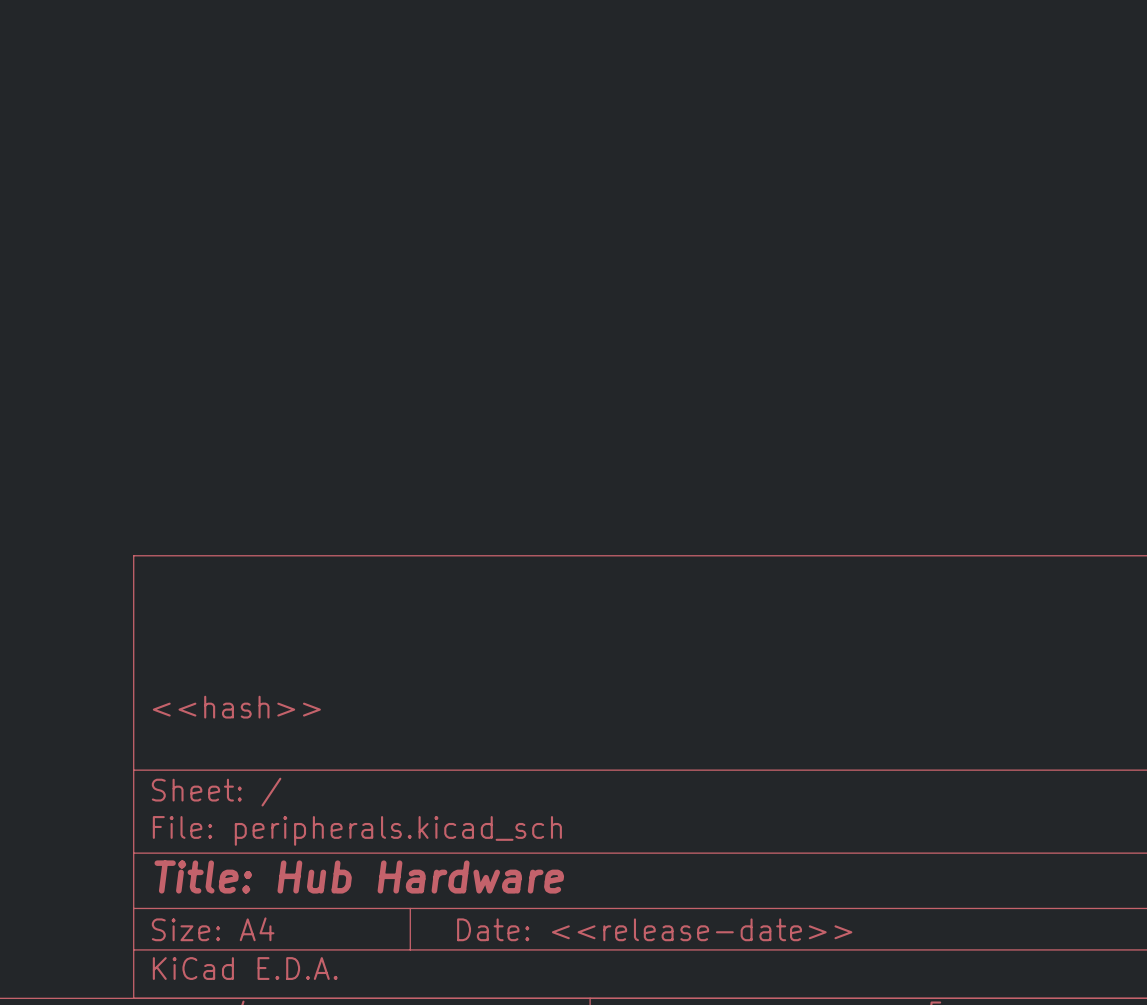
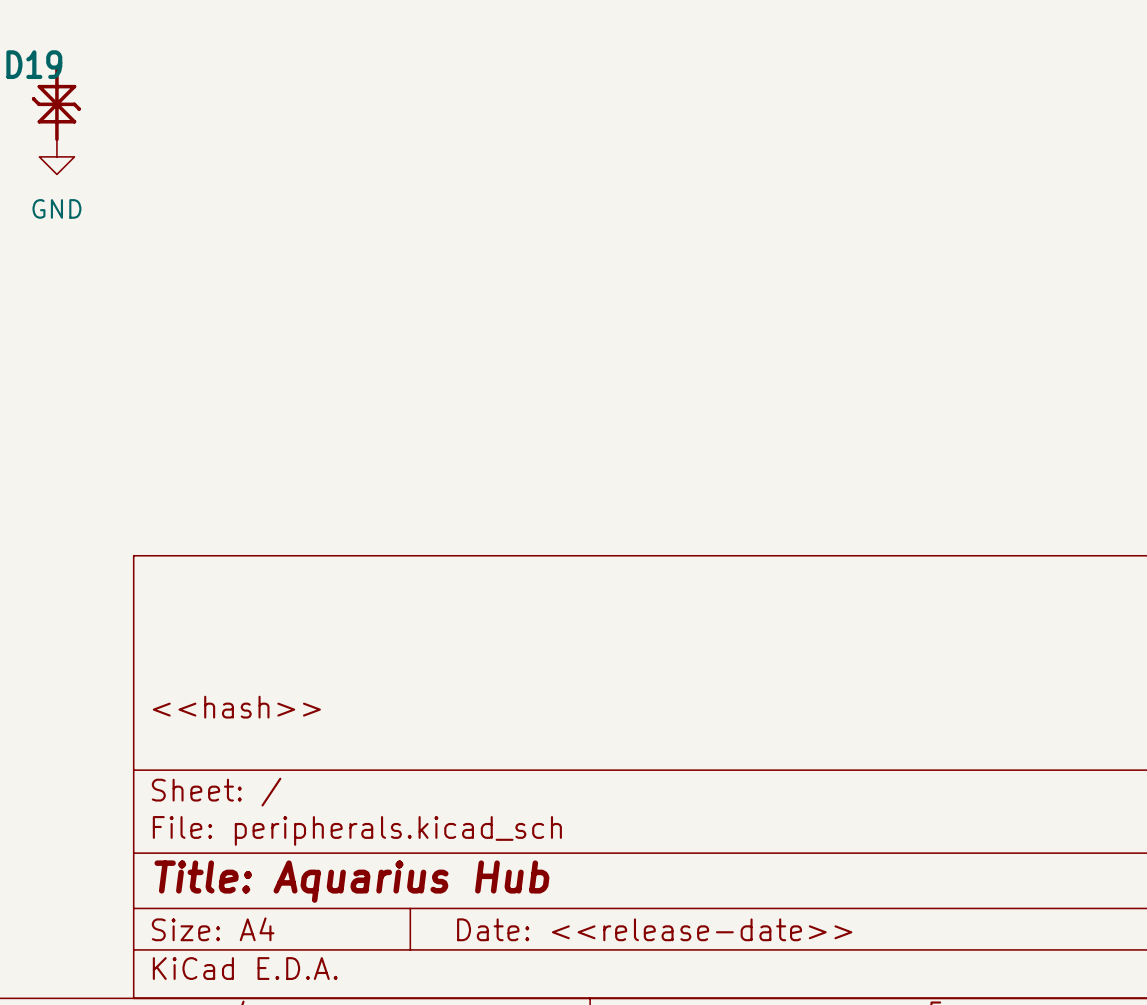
D19: none -> (56, 104)
power symbol: none -> GND (56, 156)
title block: Title: Hub Hardware (359, 876) -> Title: Aquarius Hub (351, 881)

